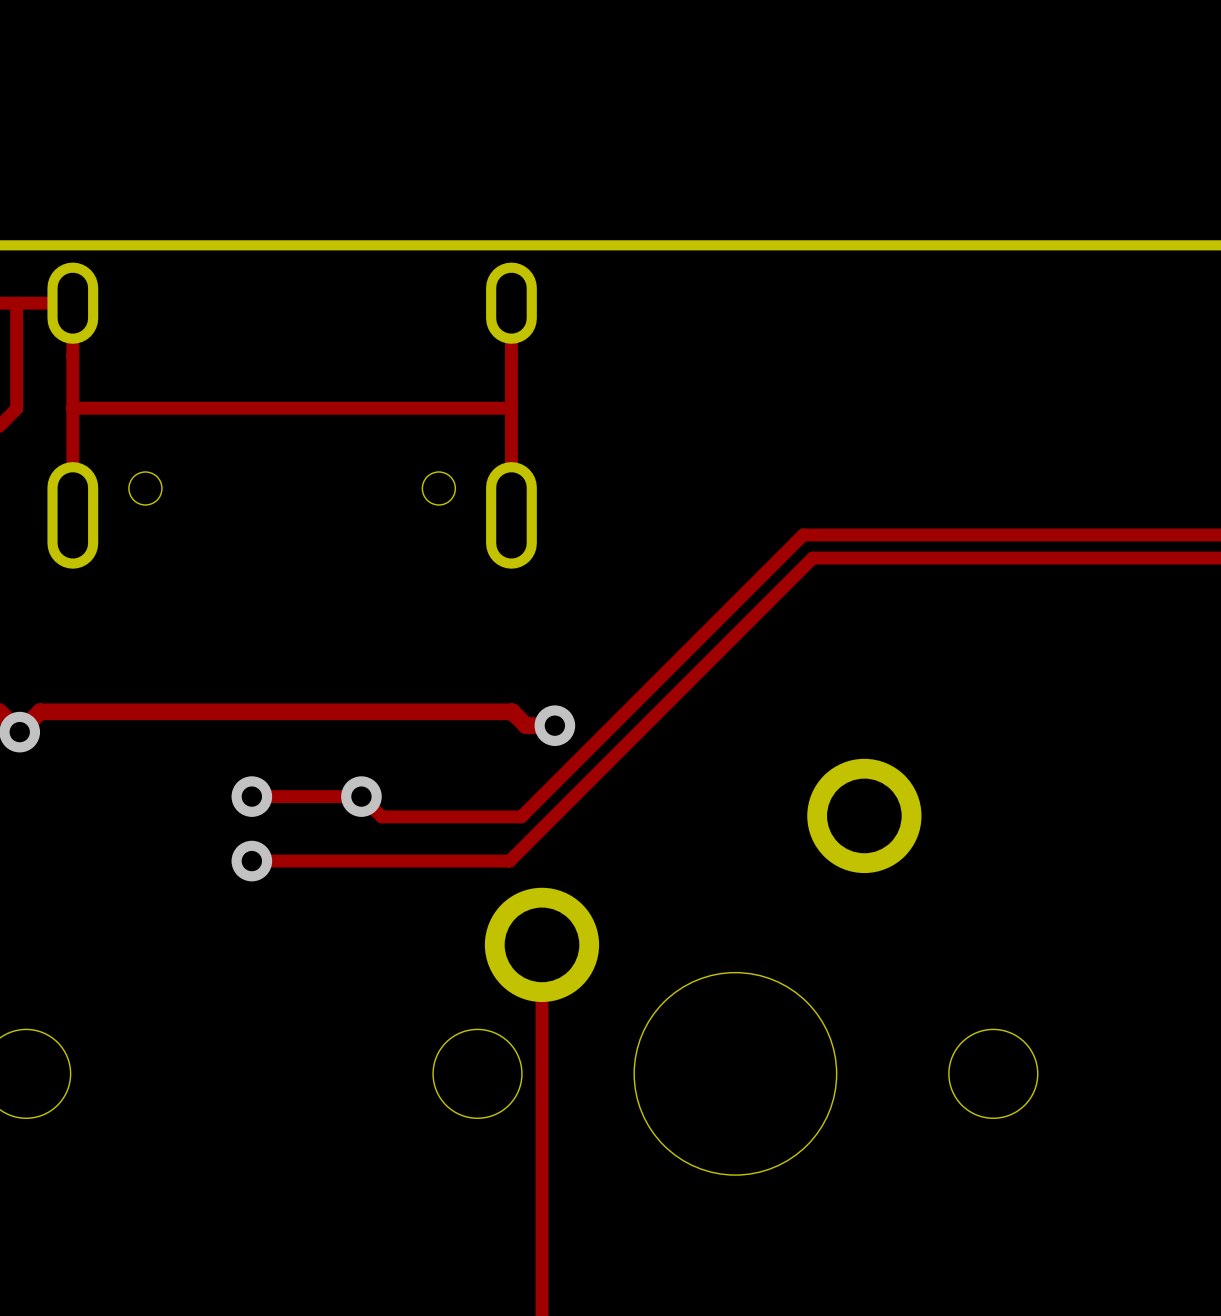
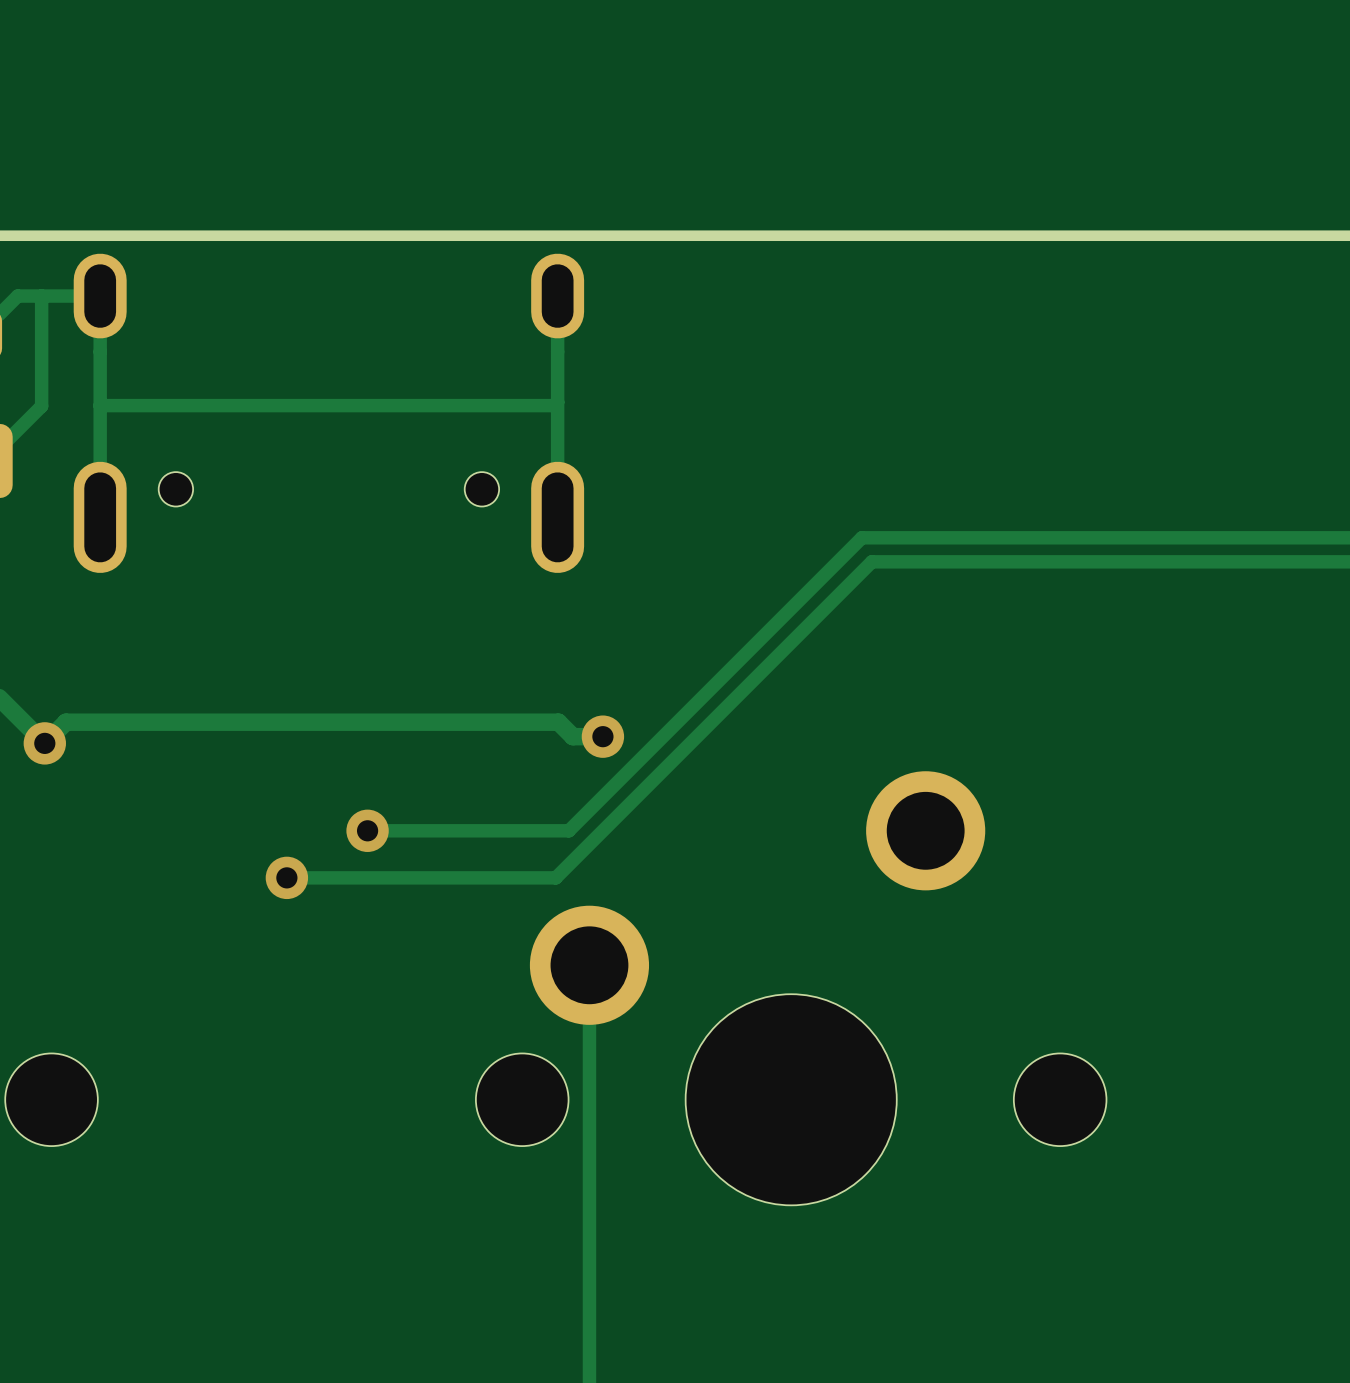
track: (251, 796) (361, 796) (381, 816) (522, 815) -> (367, 830) (568, 830)
via: (251, 796) -> none
via position: (361, 796) -> (367, 830)

